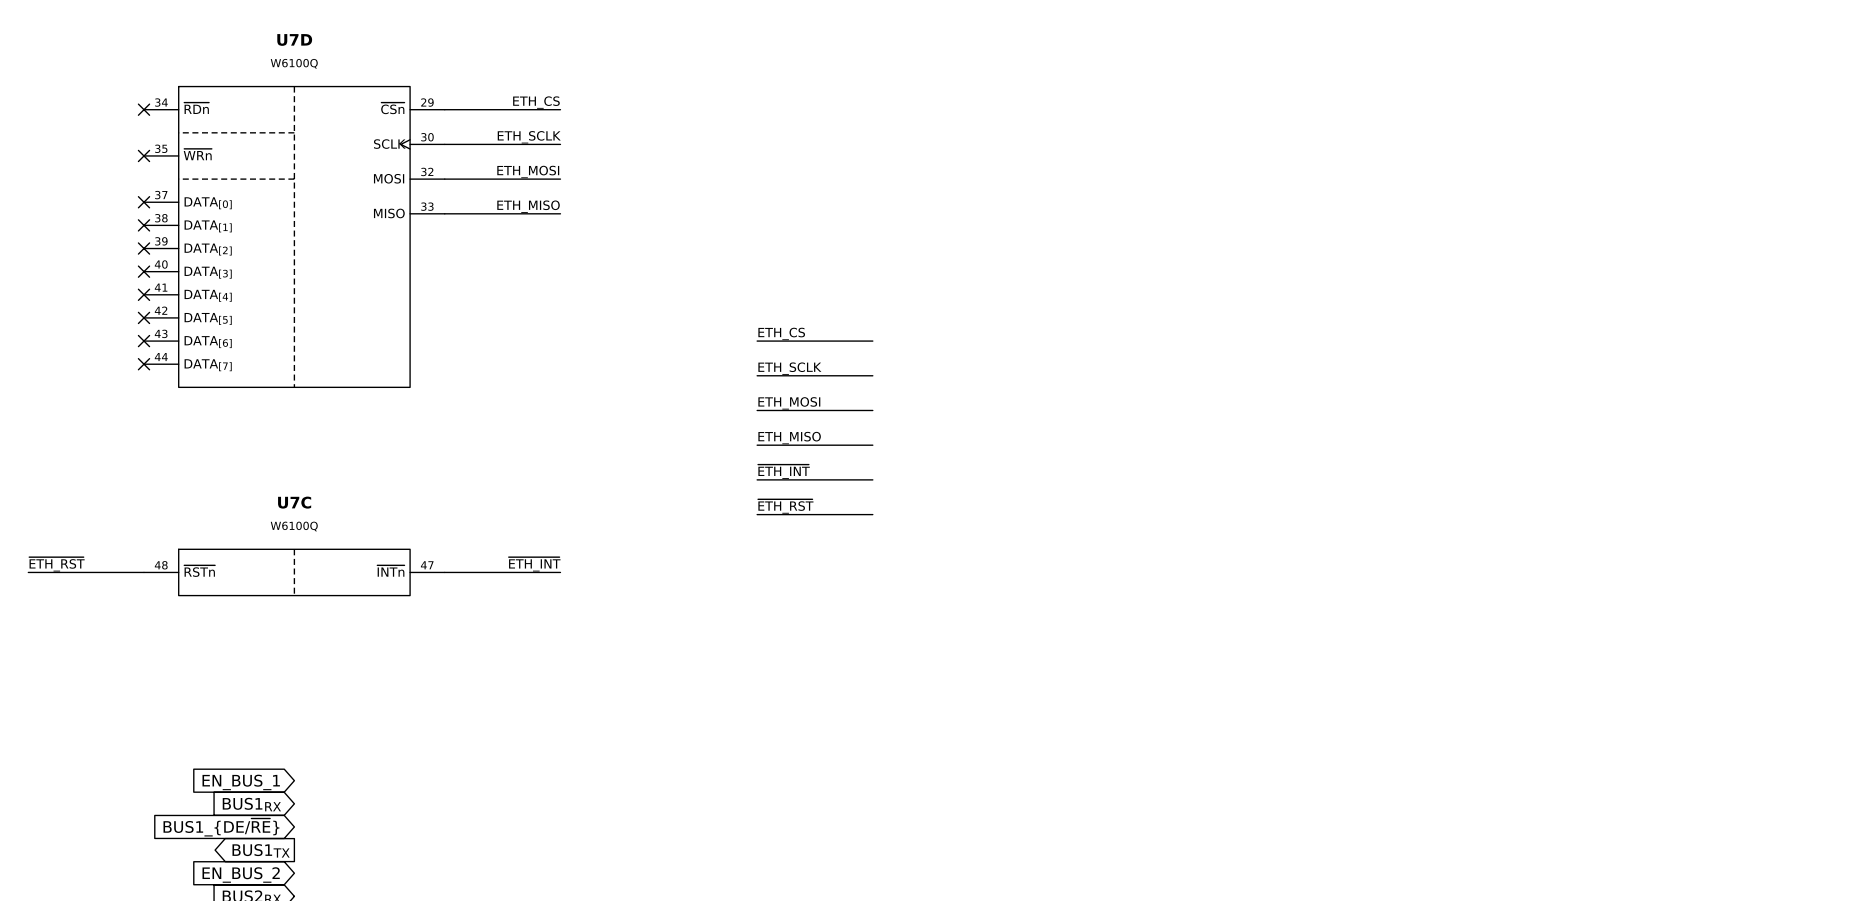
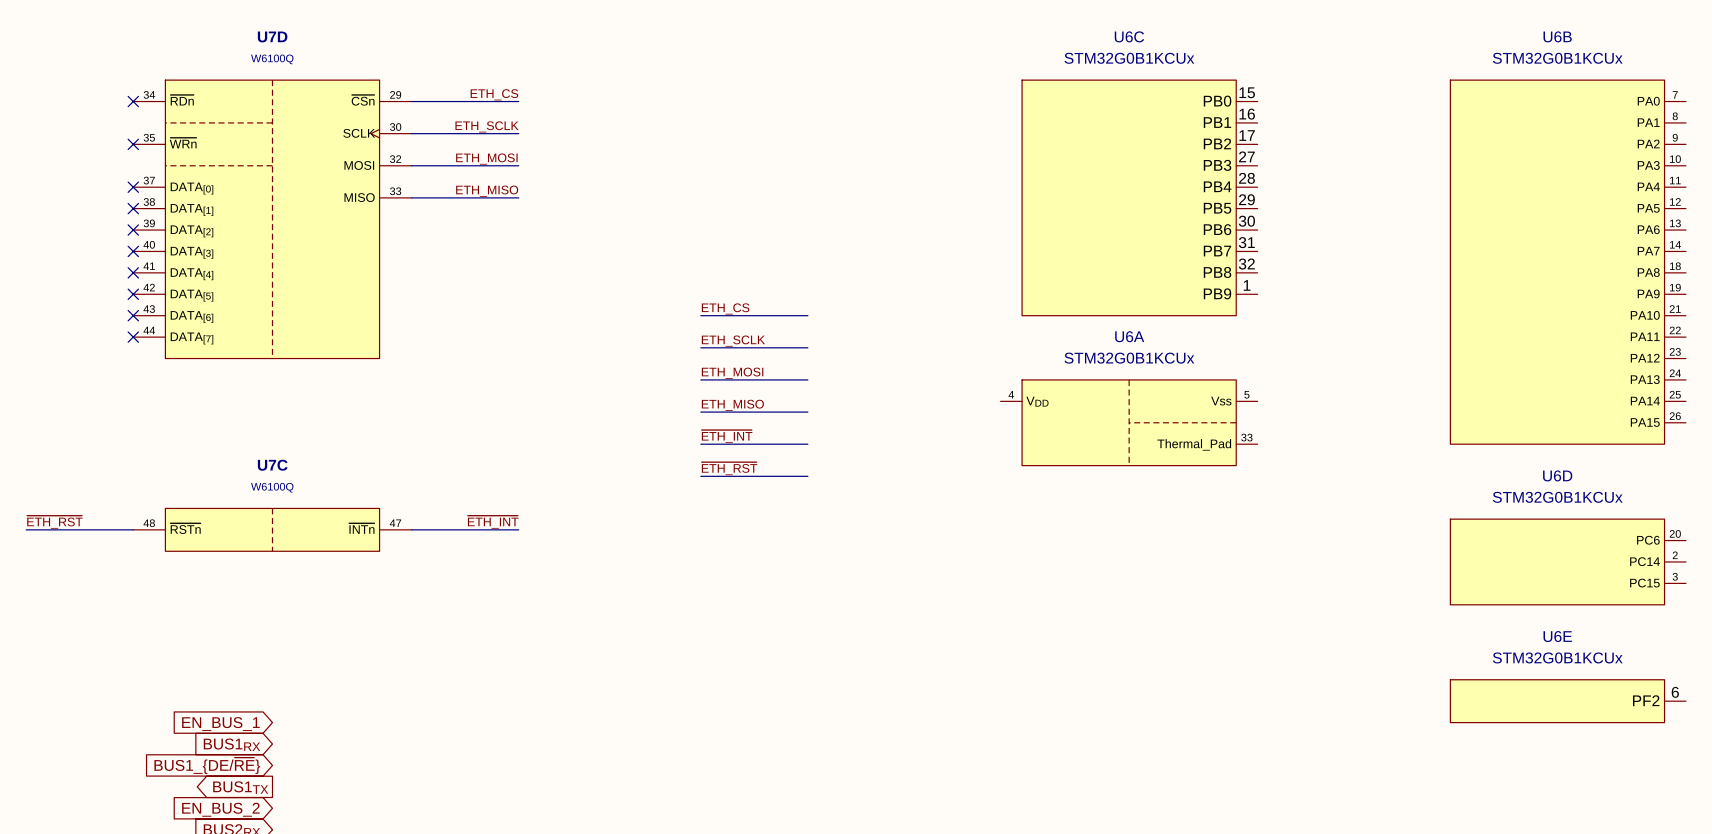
U6C: none -> STM32G0B1KCUx (1139, 197)
U6B: none -> STM32G0B1KCUx (1568, 262)
U6A: none -> STM32G0B1KCUx (1129, 422)
U6D: none -> STM32G0B1KCUx (1568, 561)
U6E: none -> STM32G0B1KCUx (1568, 701)

